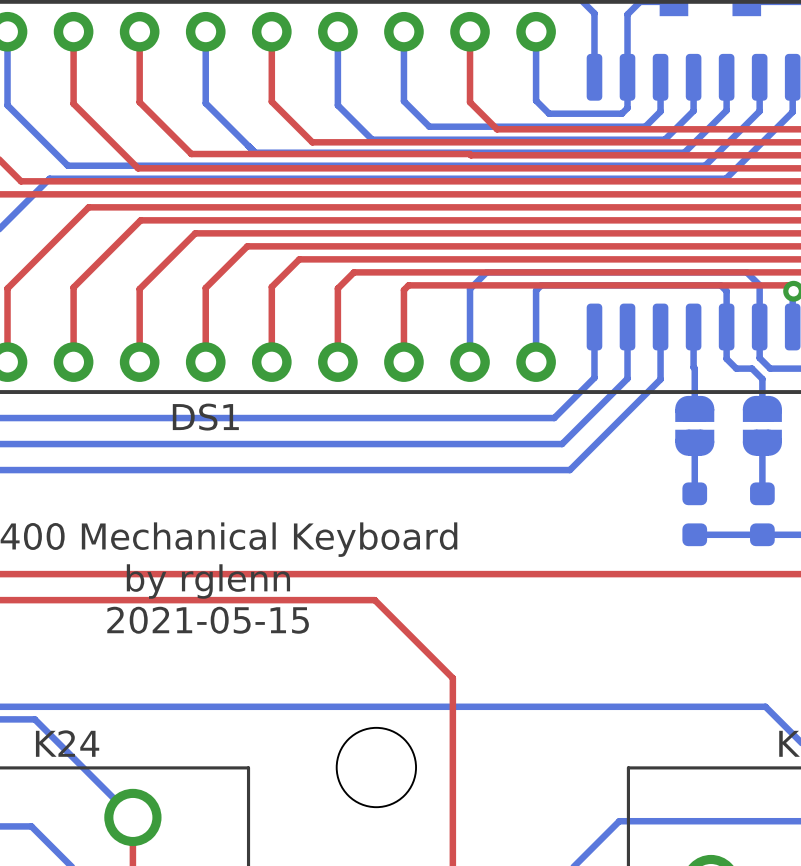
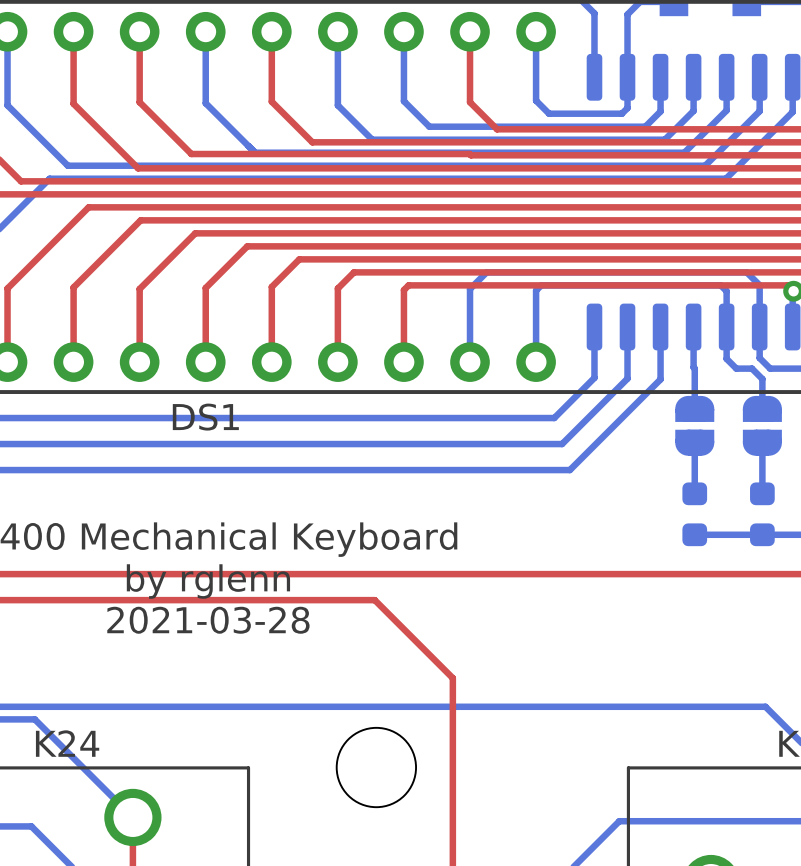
text: 2021-05-15 (208, 620) -> 2021-03-28 (208, 620)

